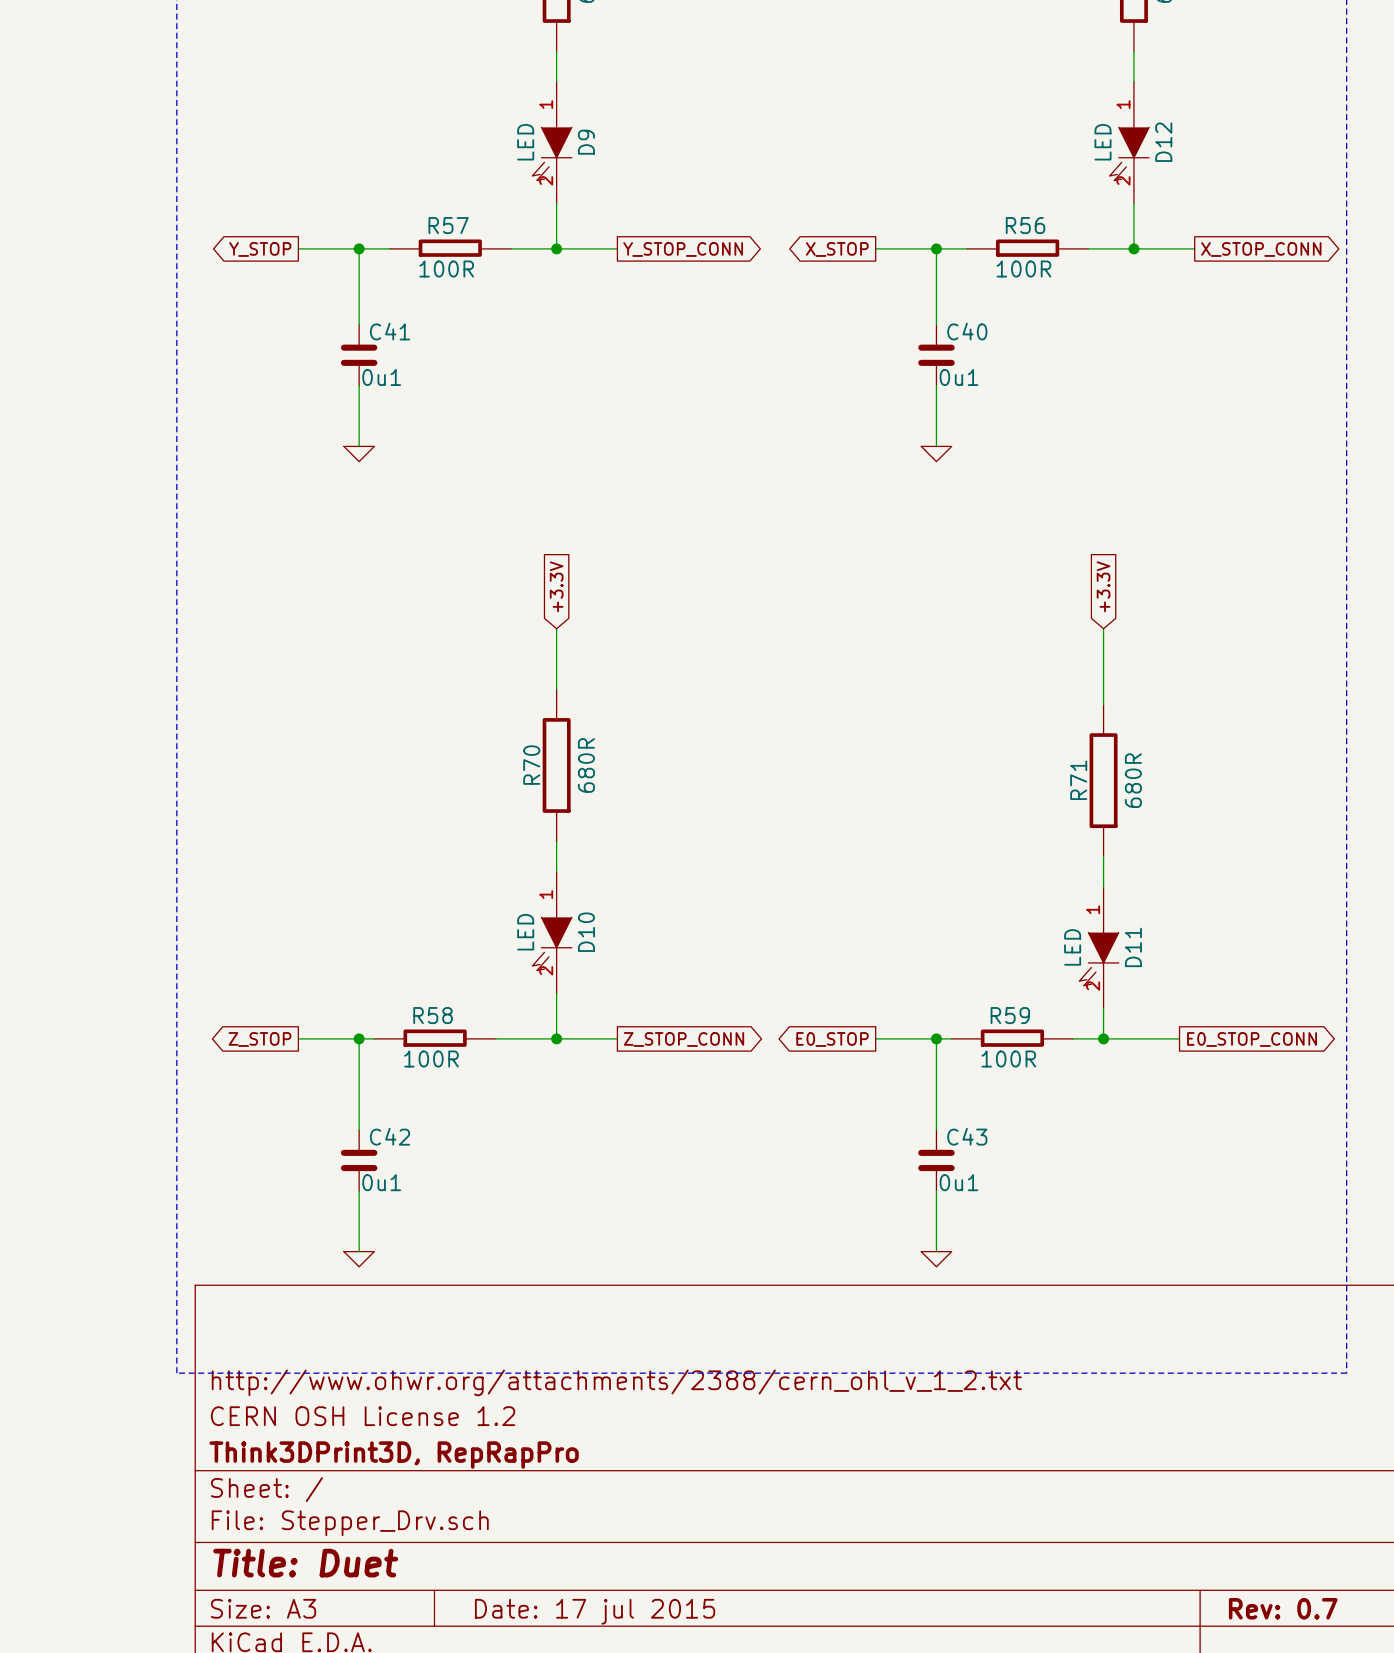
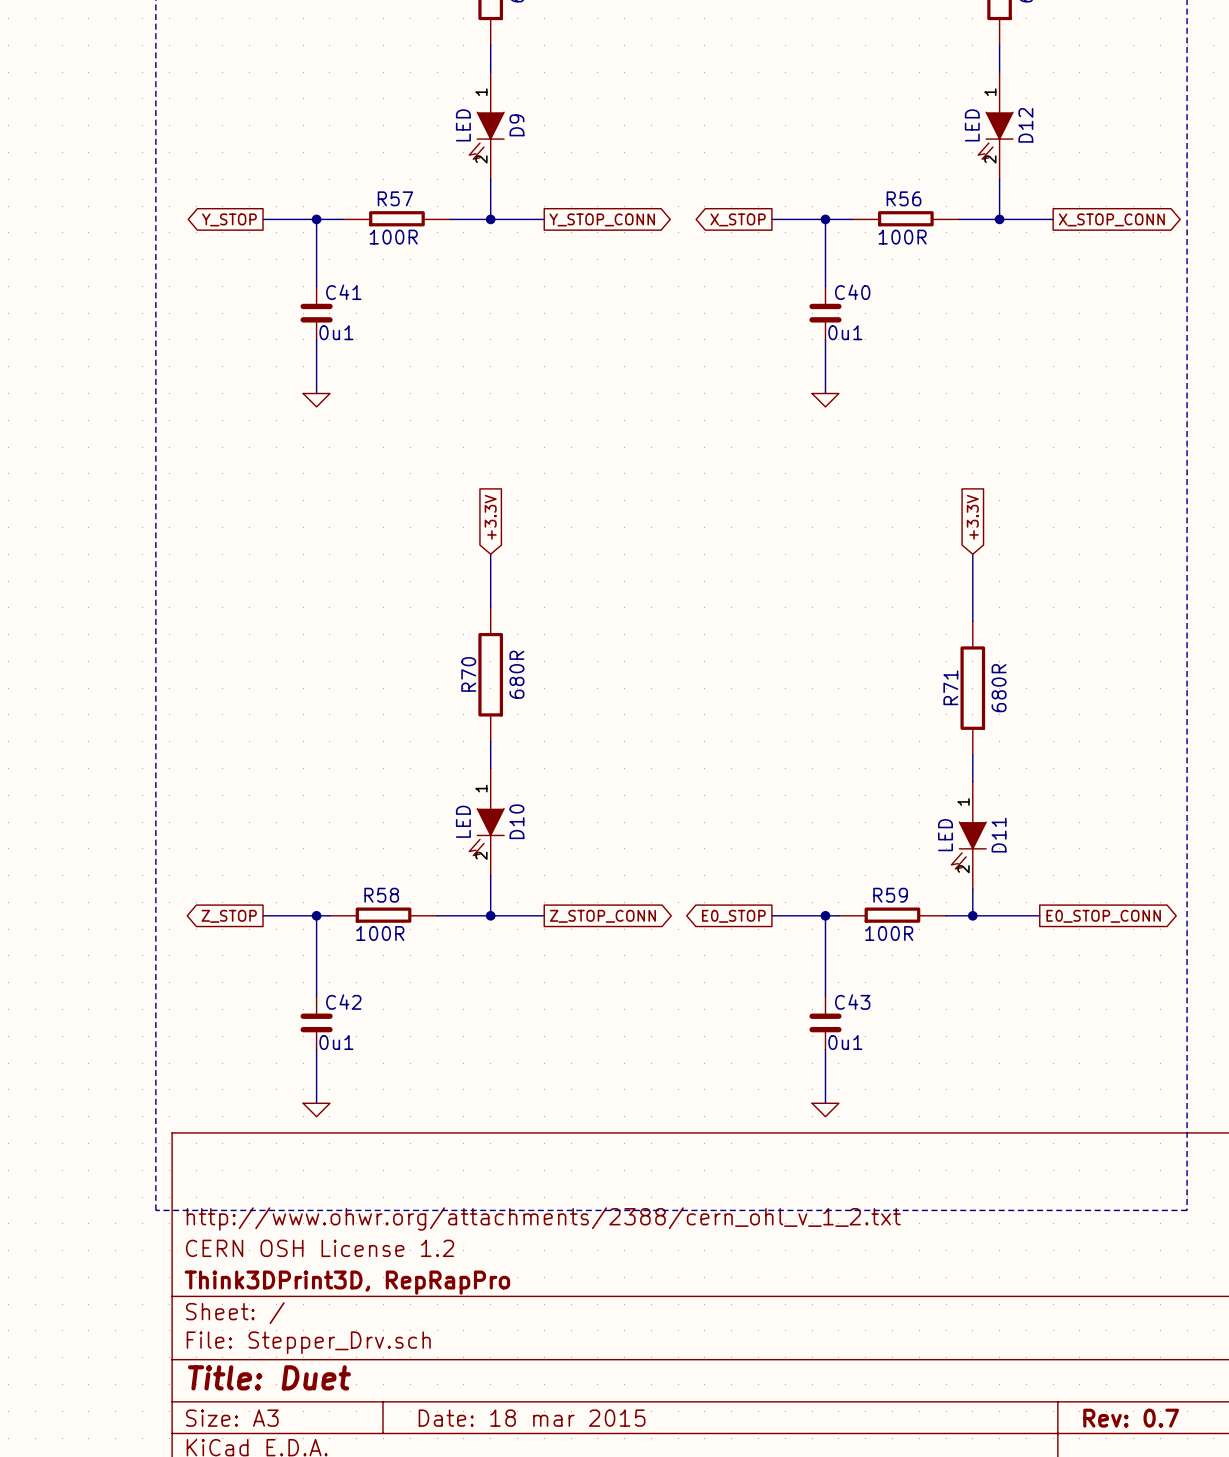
title block: Date: 17 jul 2015 (595, 1611) -> Date: 18 mar 2015 (532, 1418)

